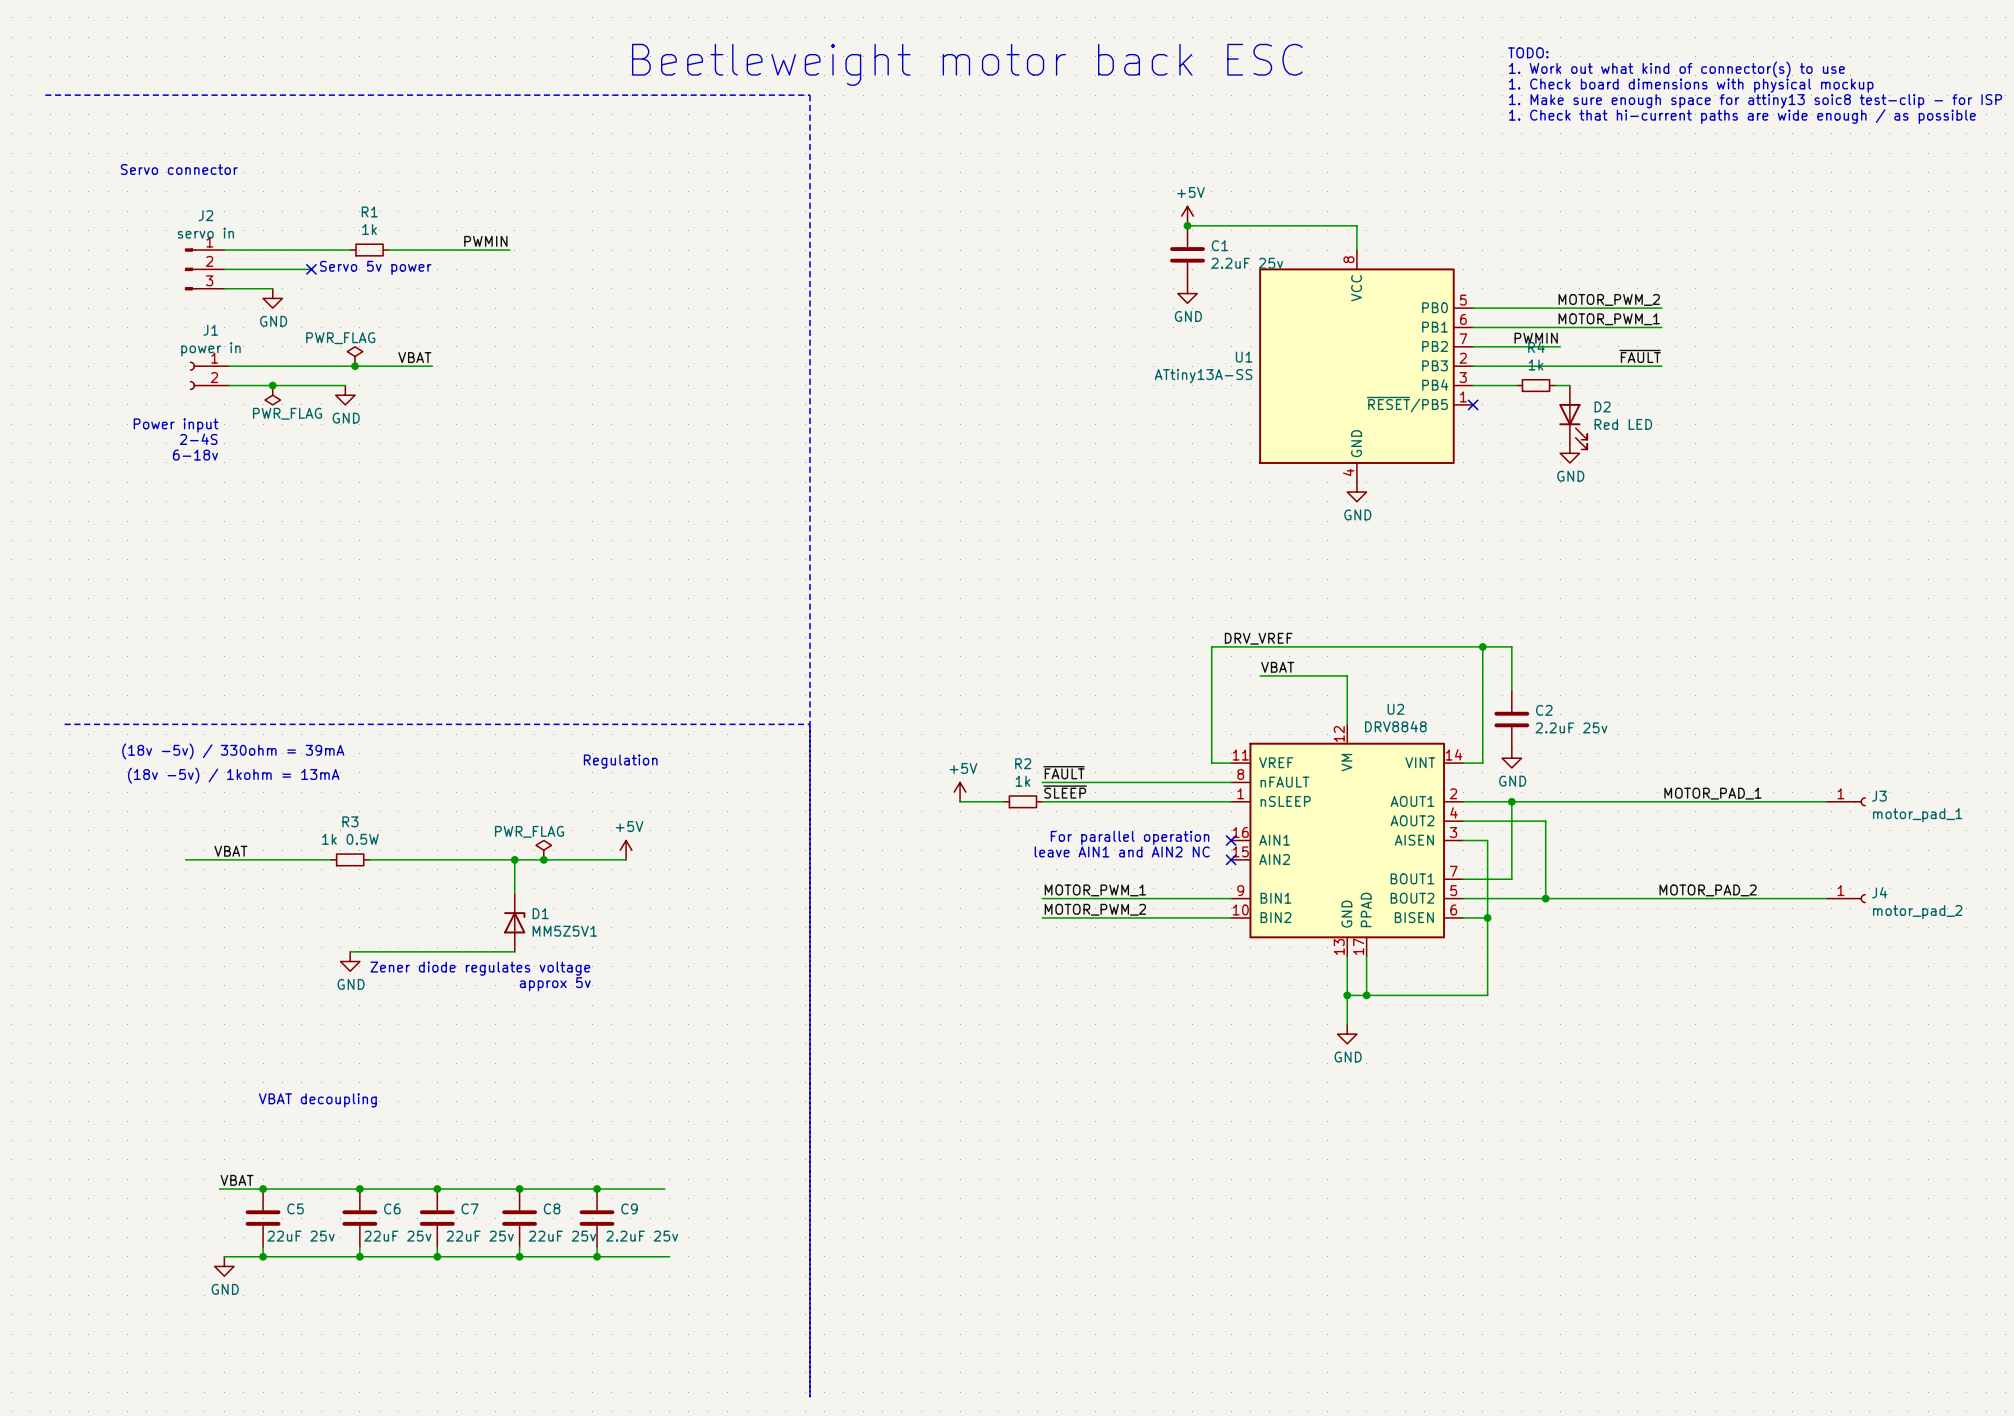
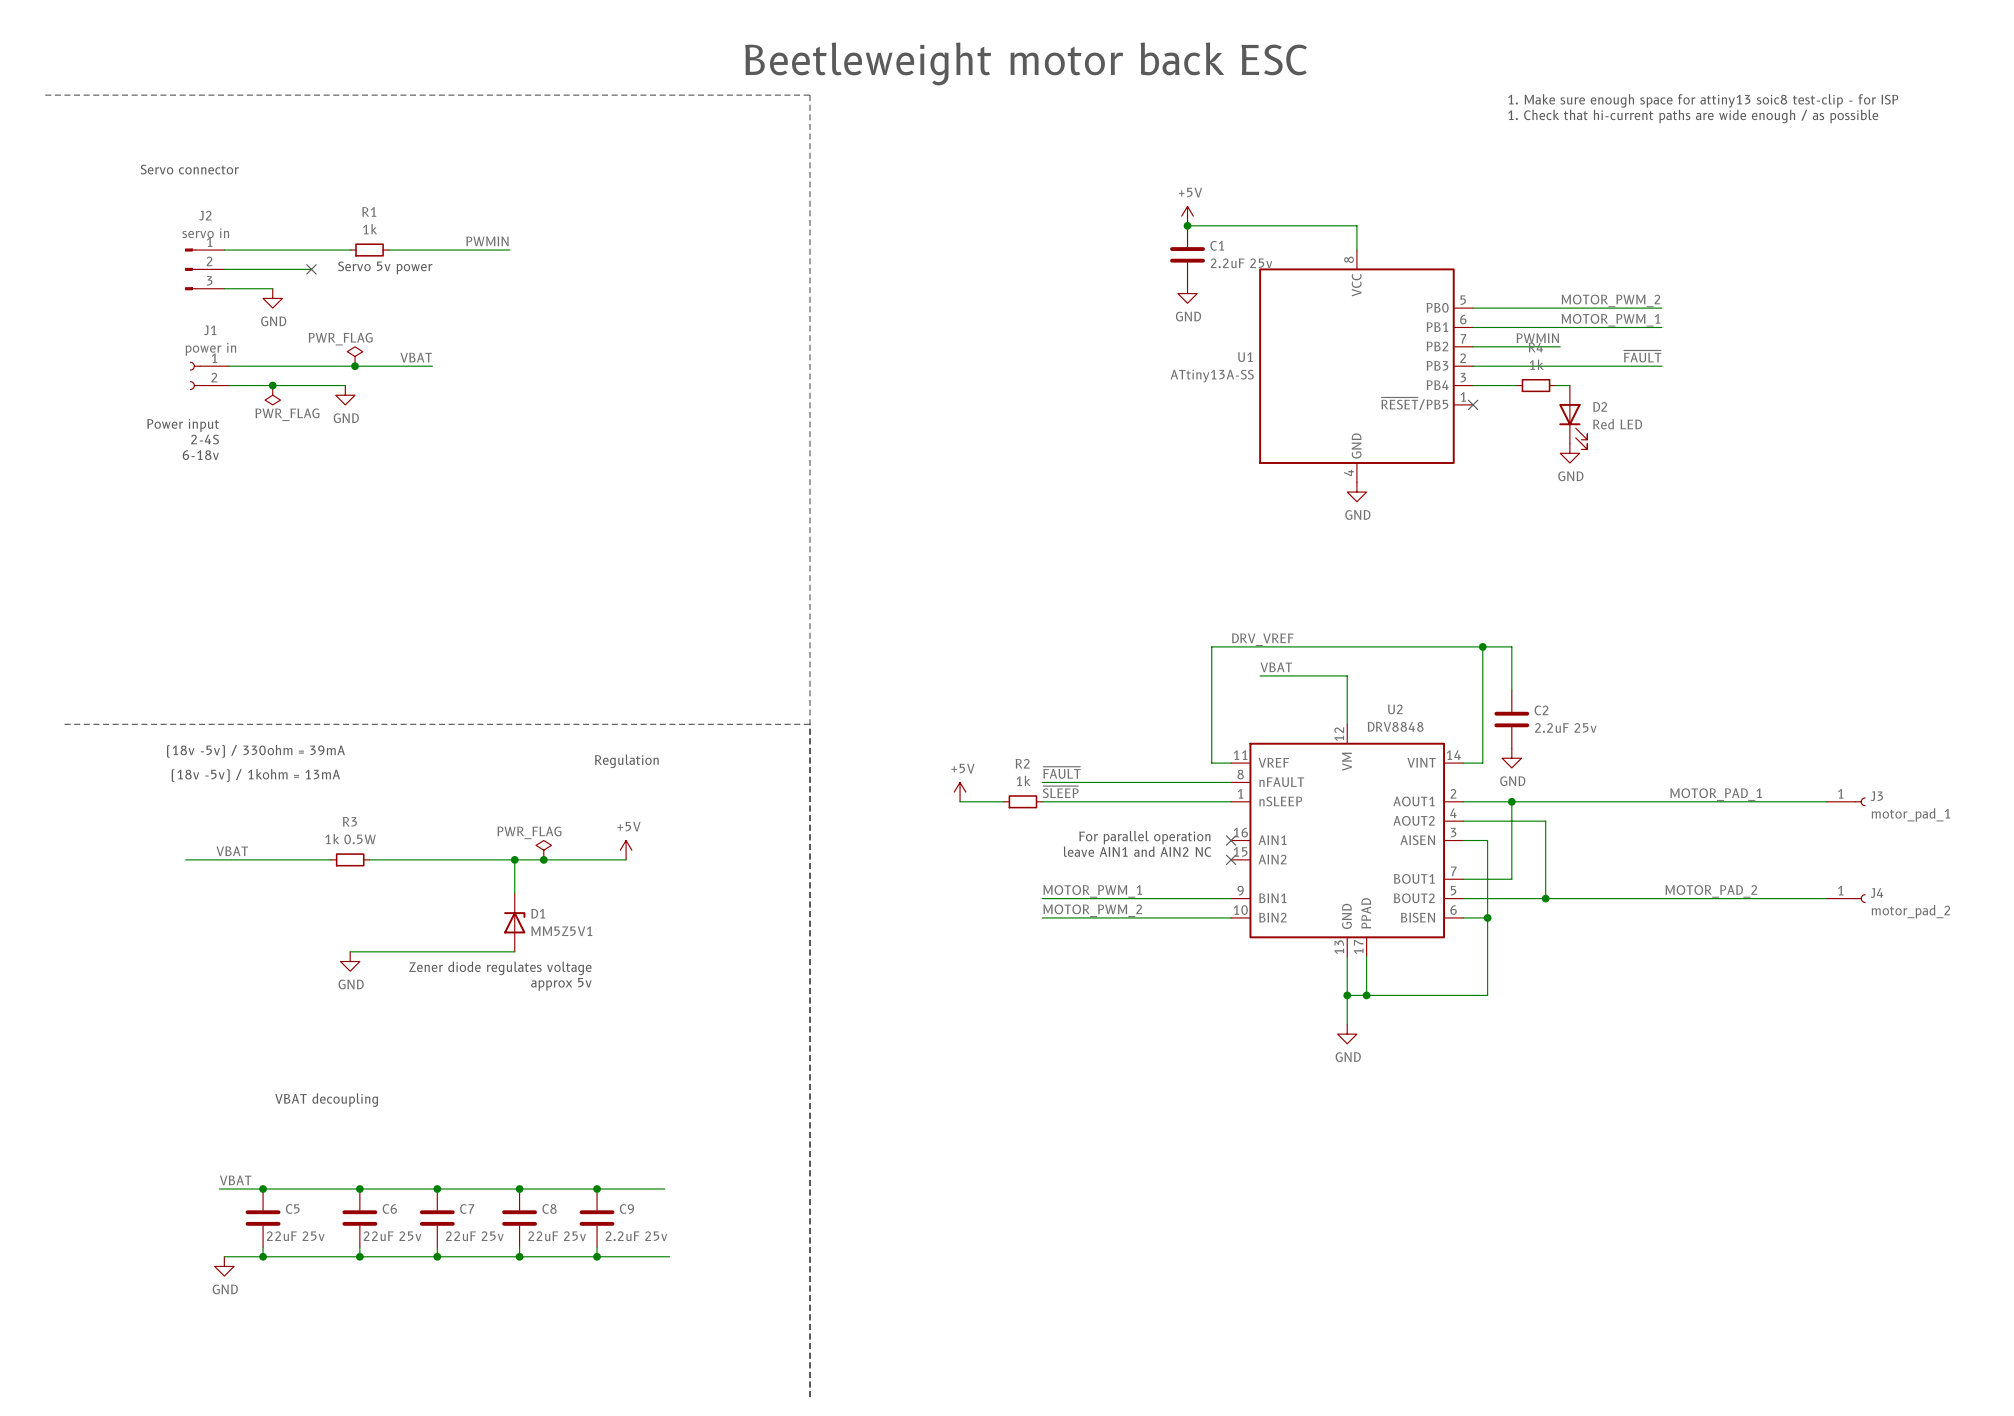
text: TODO: (1528, 52) -> none
text: 1. Work out what kind of connector(s) to use (1676, 69) -> none
text: 1. Check board dimensions with physical mockup (1691, 85) -> none

